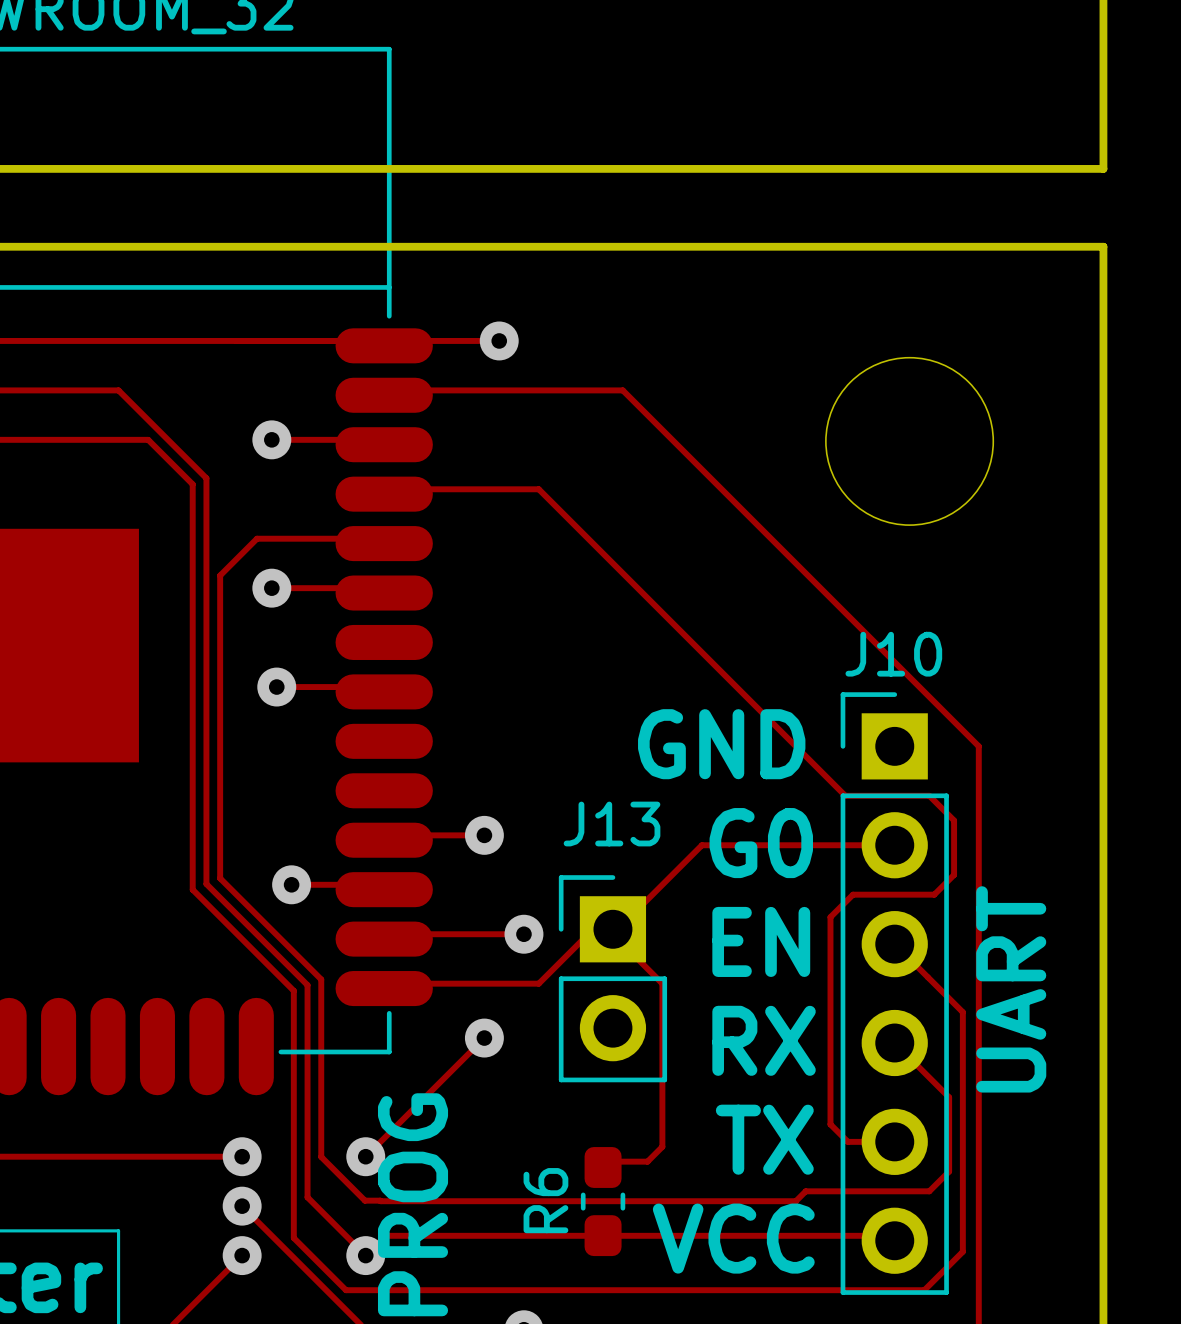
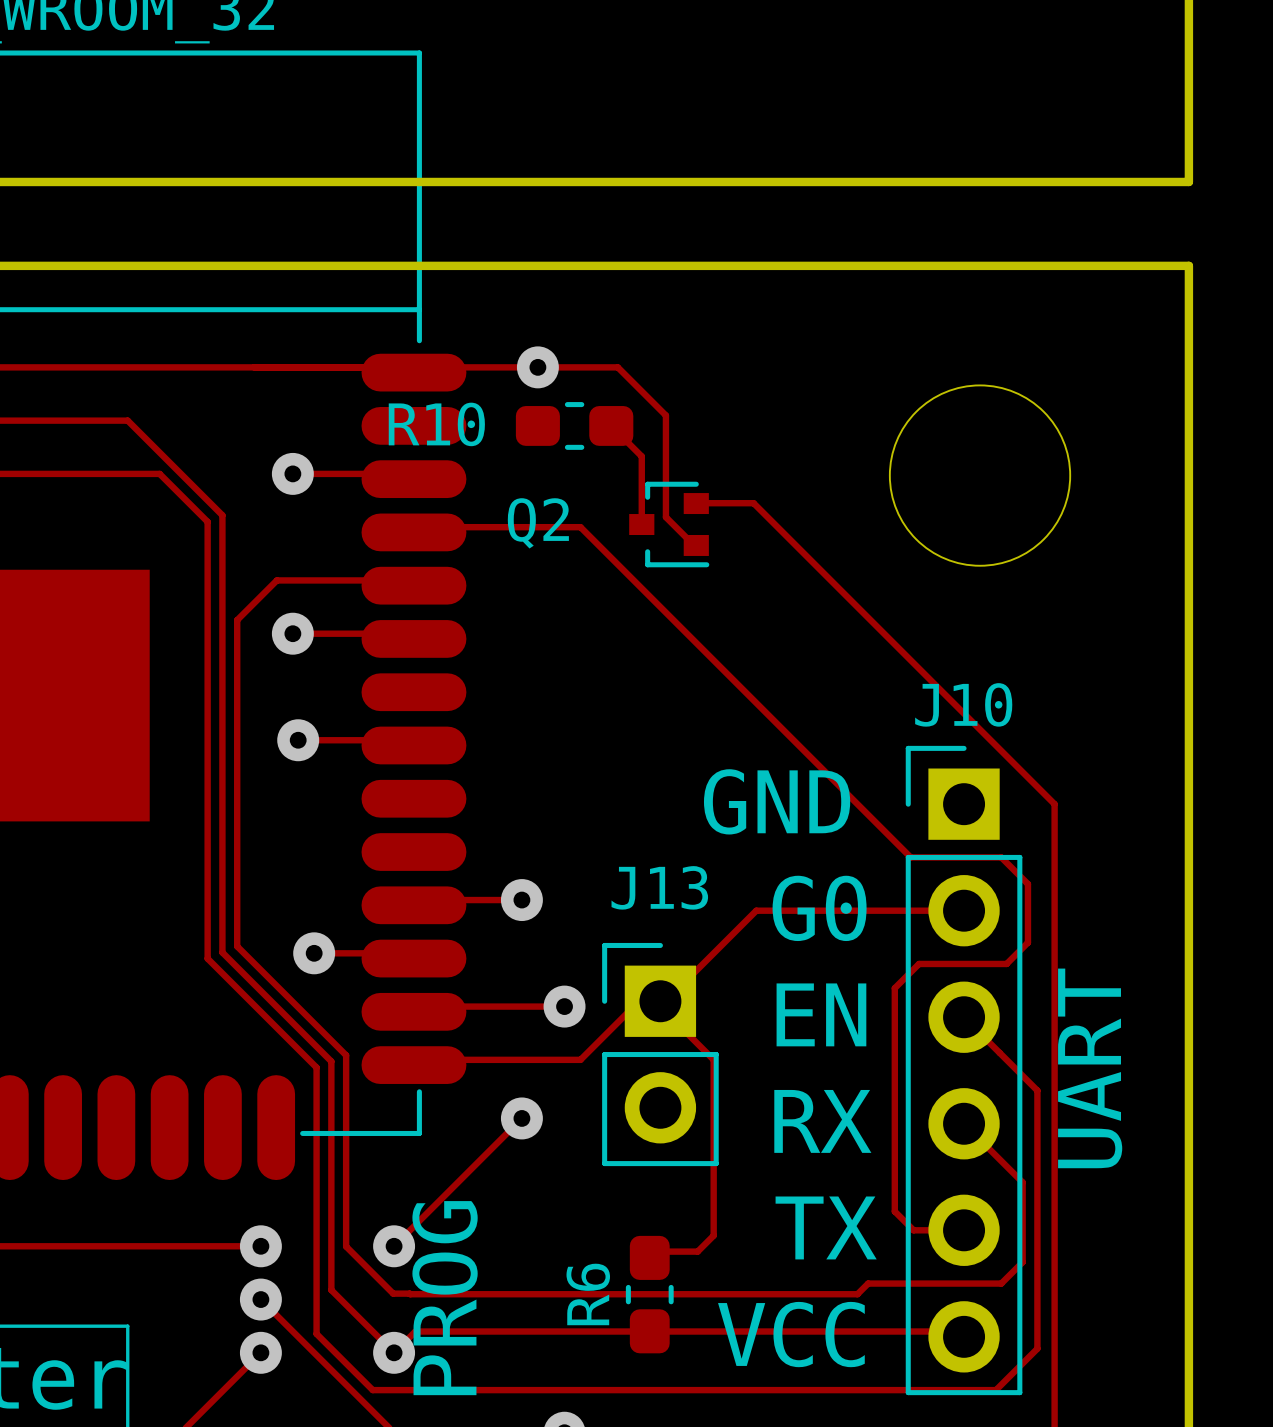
track: none -> (537, 367) (617, 367) (665, 415) (665, 517) (696, 545)
track: (384, 390) (622, 390) (699, 467) -> (695, 503) (753, 503)
R10: none -> (574, 425)
track: none -> (611, 425) (641, 456) (641, 524)
Q2: none -> (669, 524)

